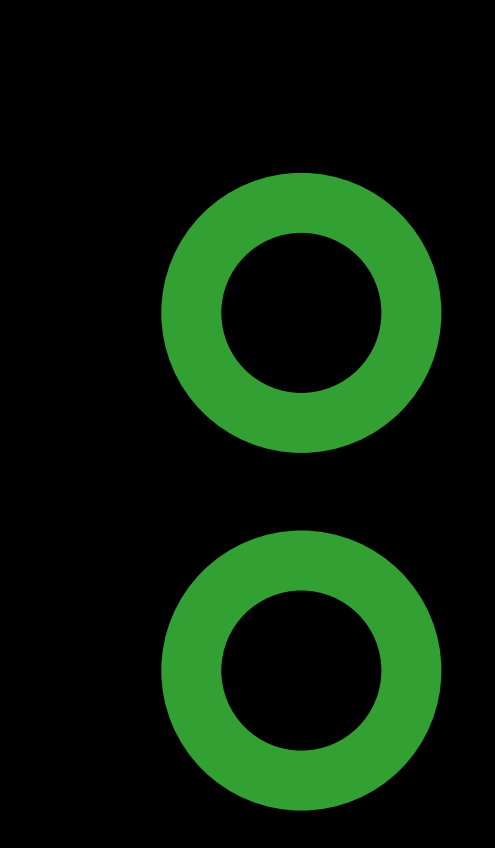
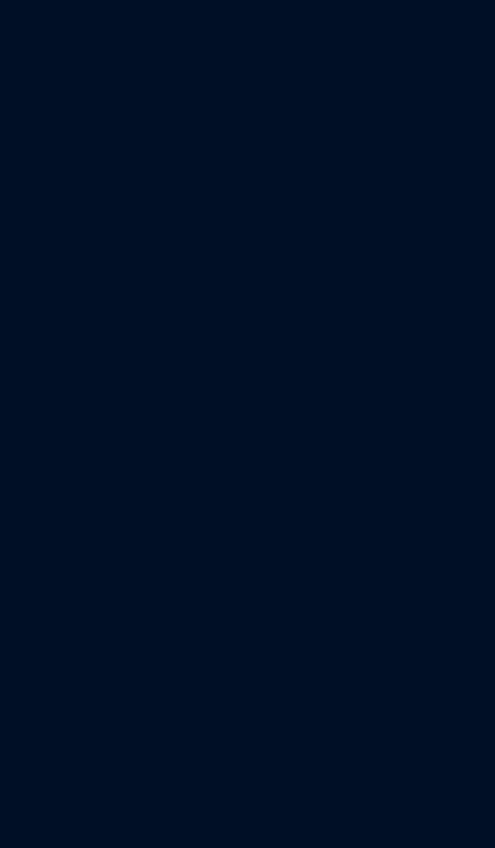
part: (301, 312) -> none
part: (301, 670) -> none

